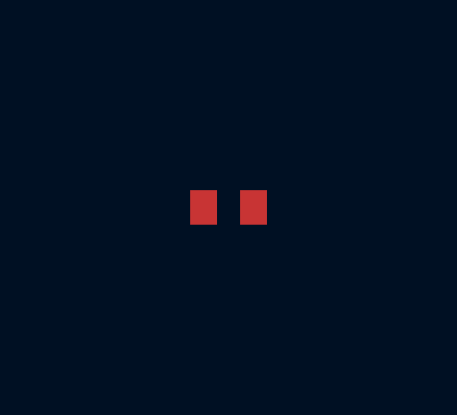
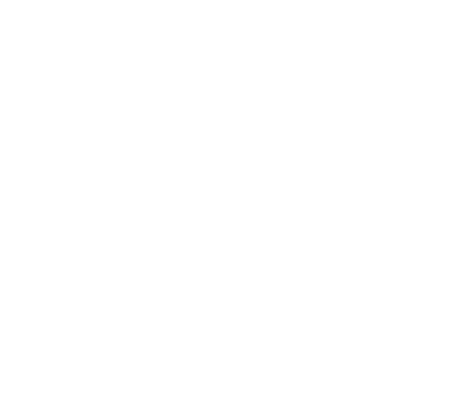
part: (228, 207) -> none

